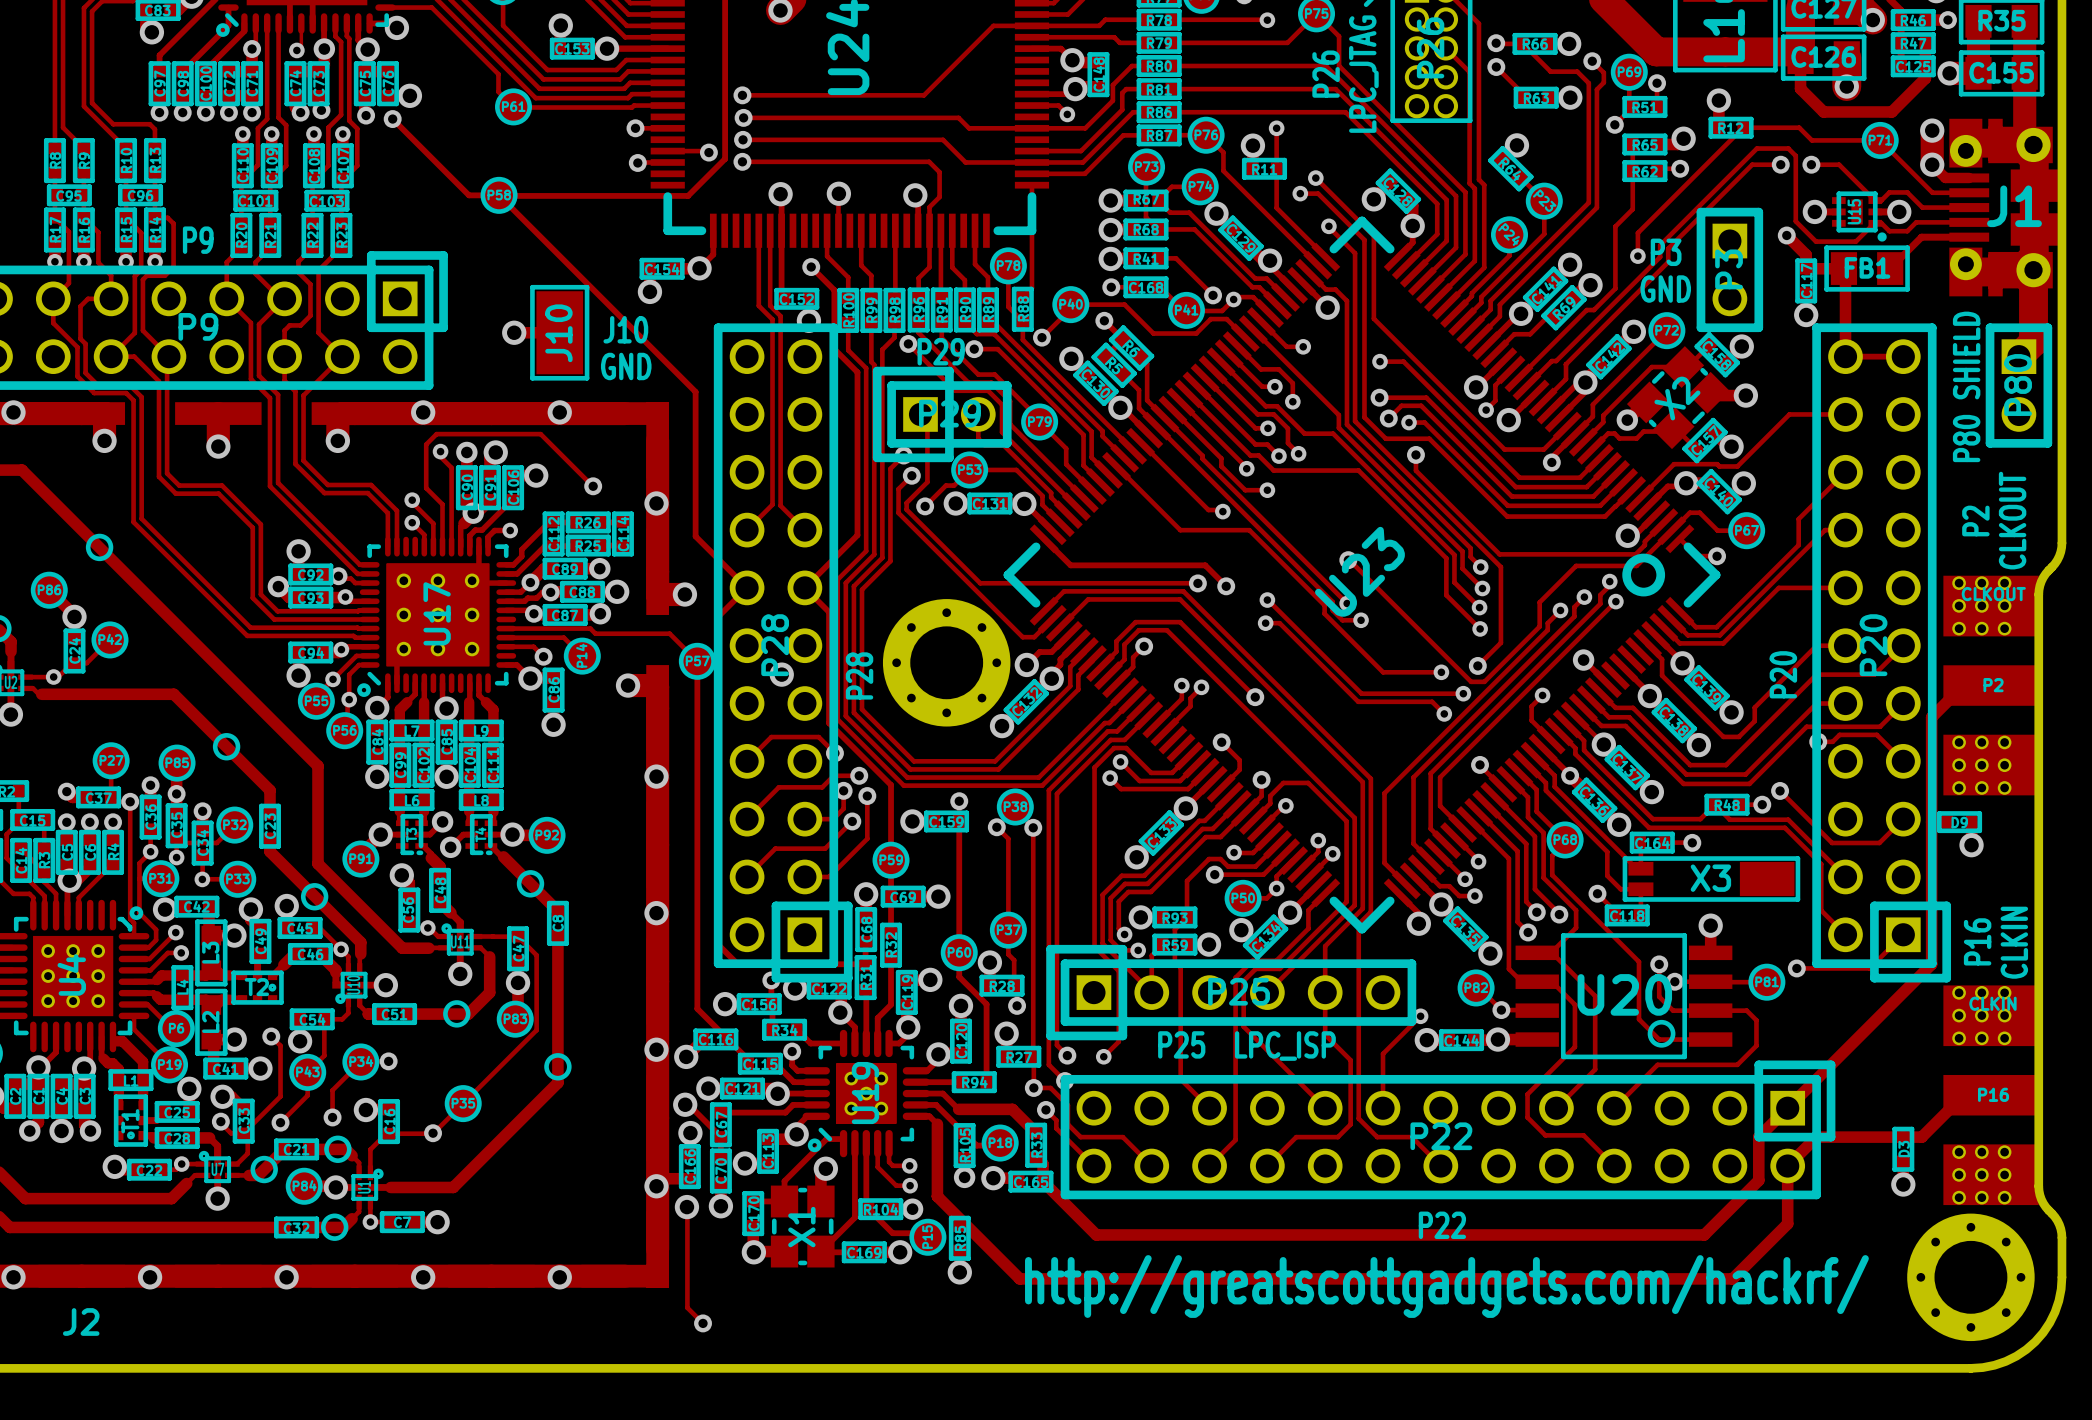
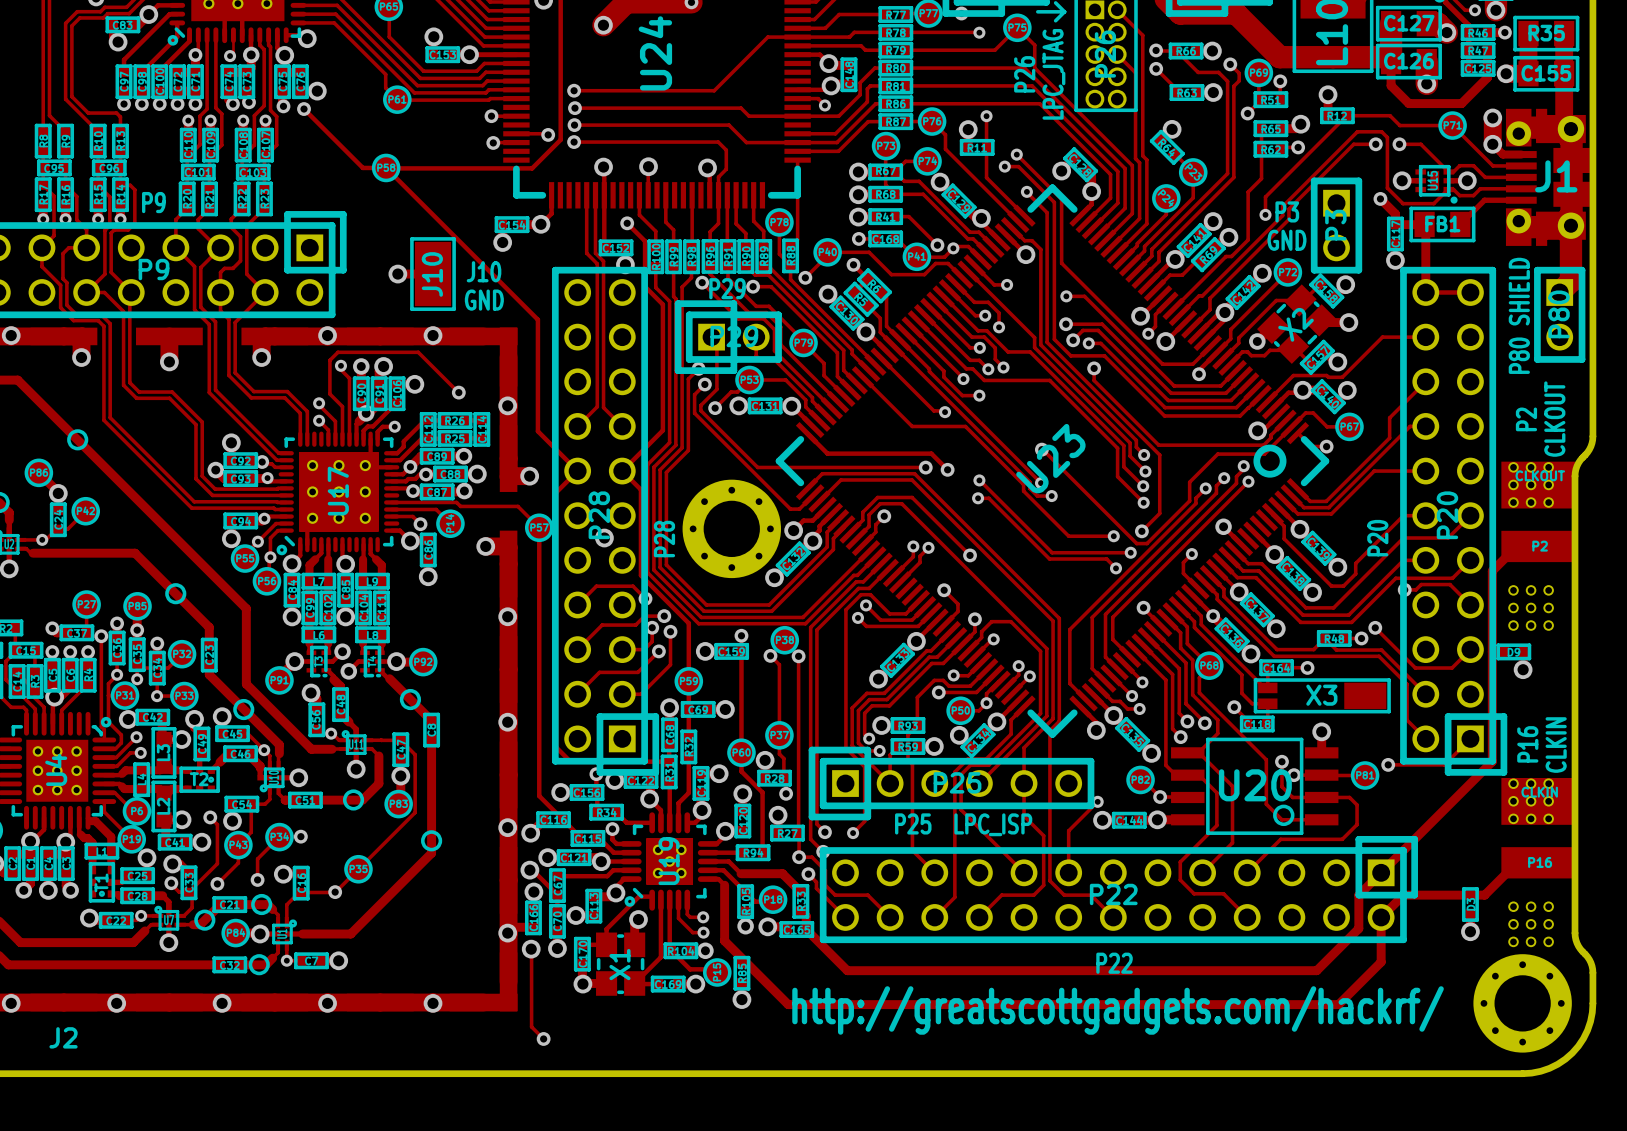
P2 footprint: [1943, 575, 2039, 796] -> [1501, 461, 1576, 631]
P16 footprint: [1943, 985, 2039, 1206] -> [1501, 778, 1576, 948]

